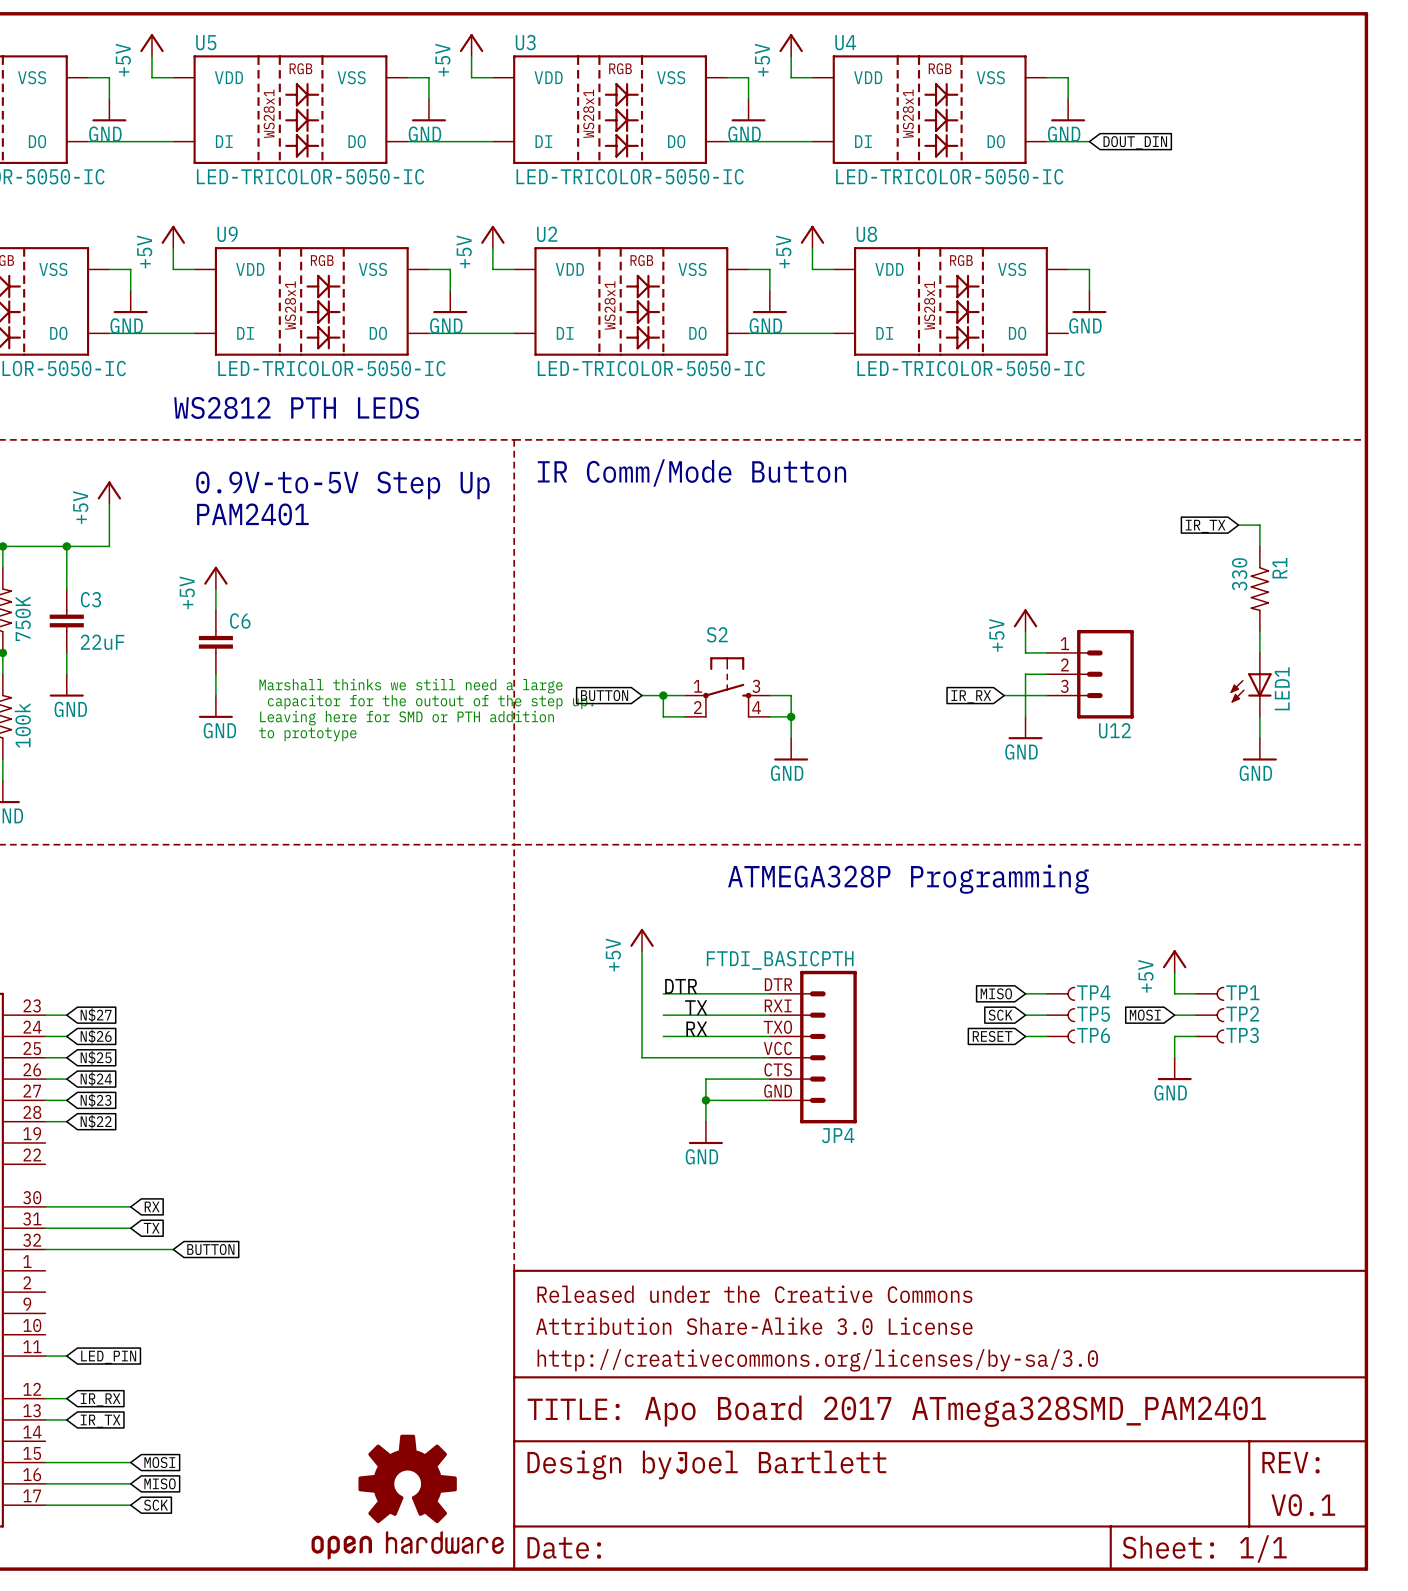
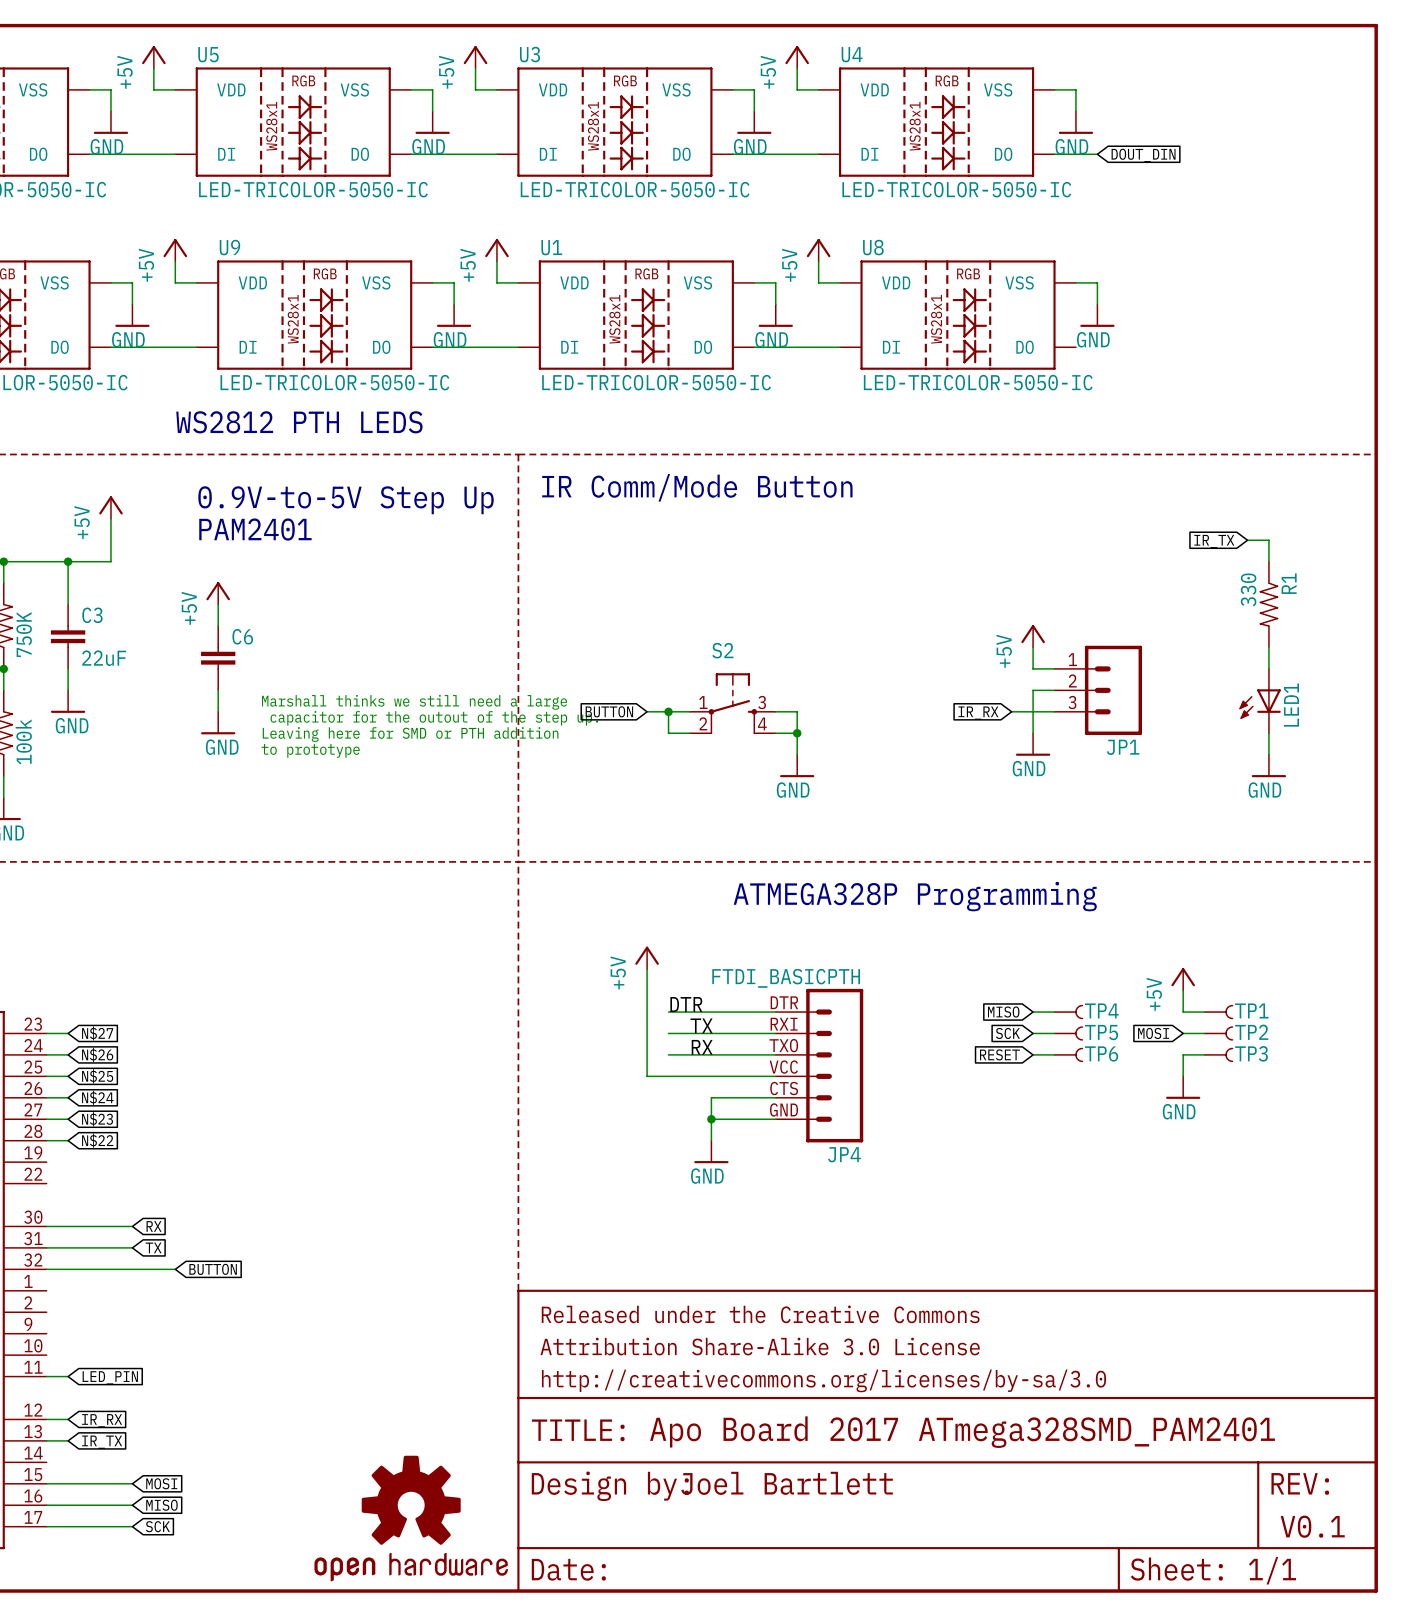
U2 name: U2 (547, 234) -> U1 (551, 247)
U12 name: U12 (1114, 730) -> JP1 (1123, 747)

